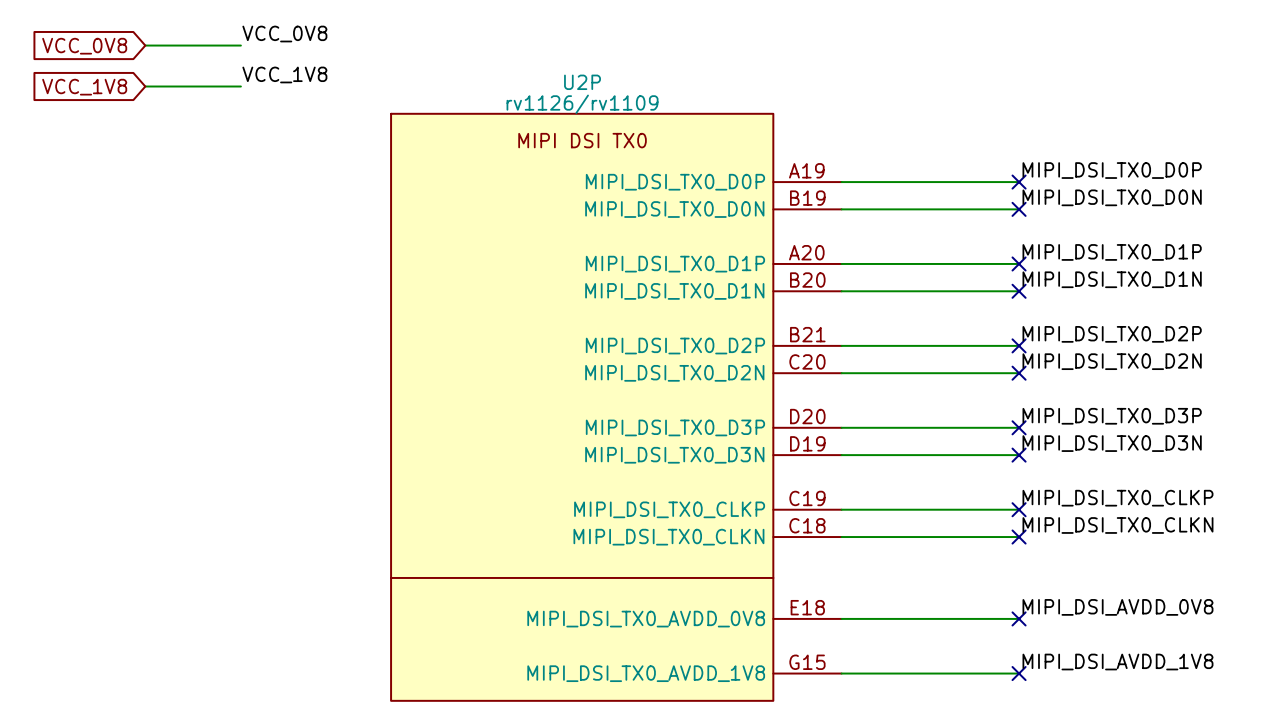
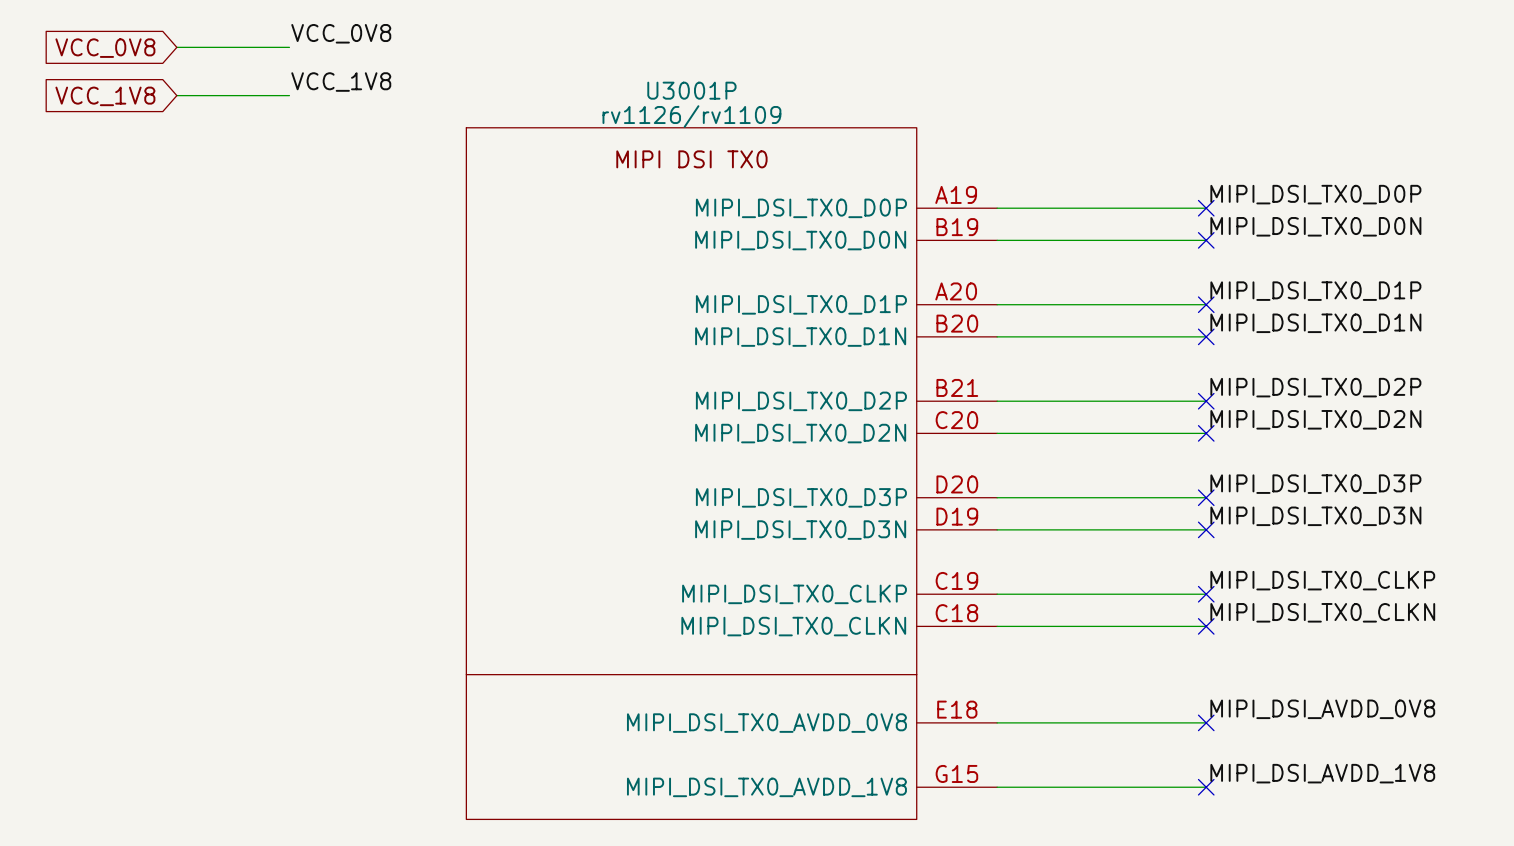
U2P: rv1126/rv1109 (616, 407) -> none
U3001P: none -> rv1126/rv1109 (731, 473)

